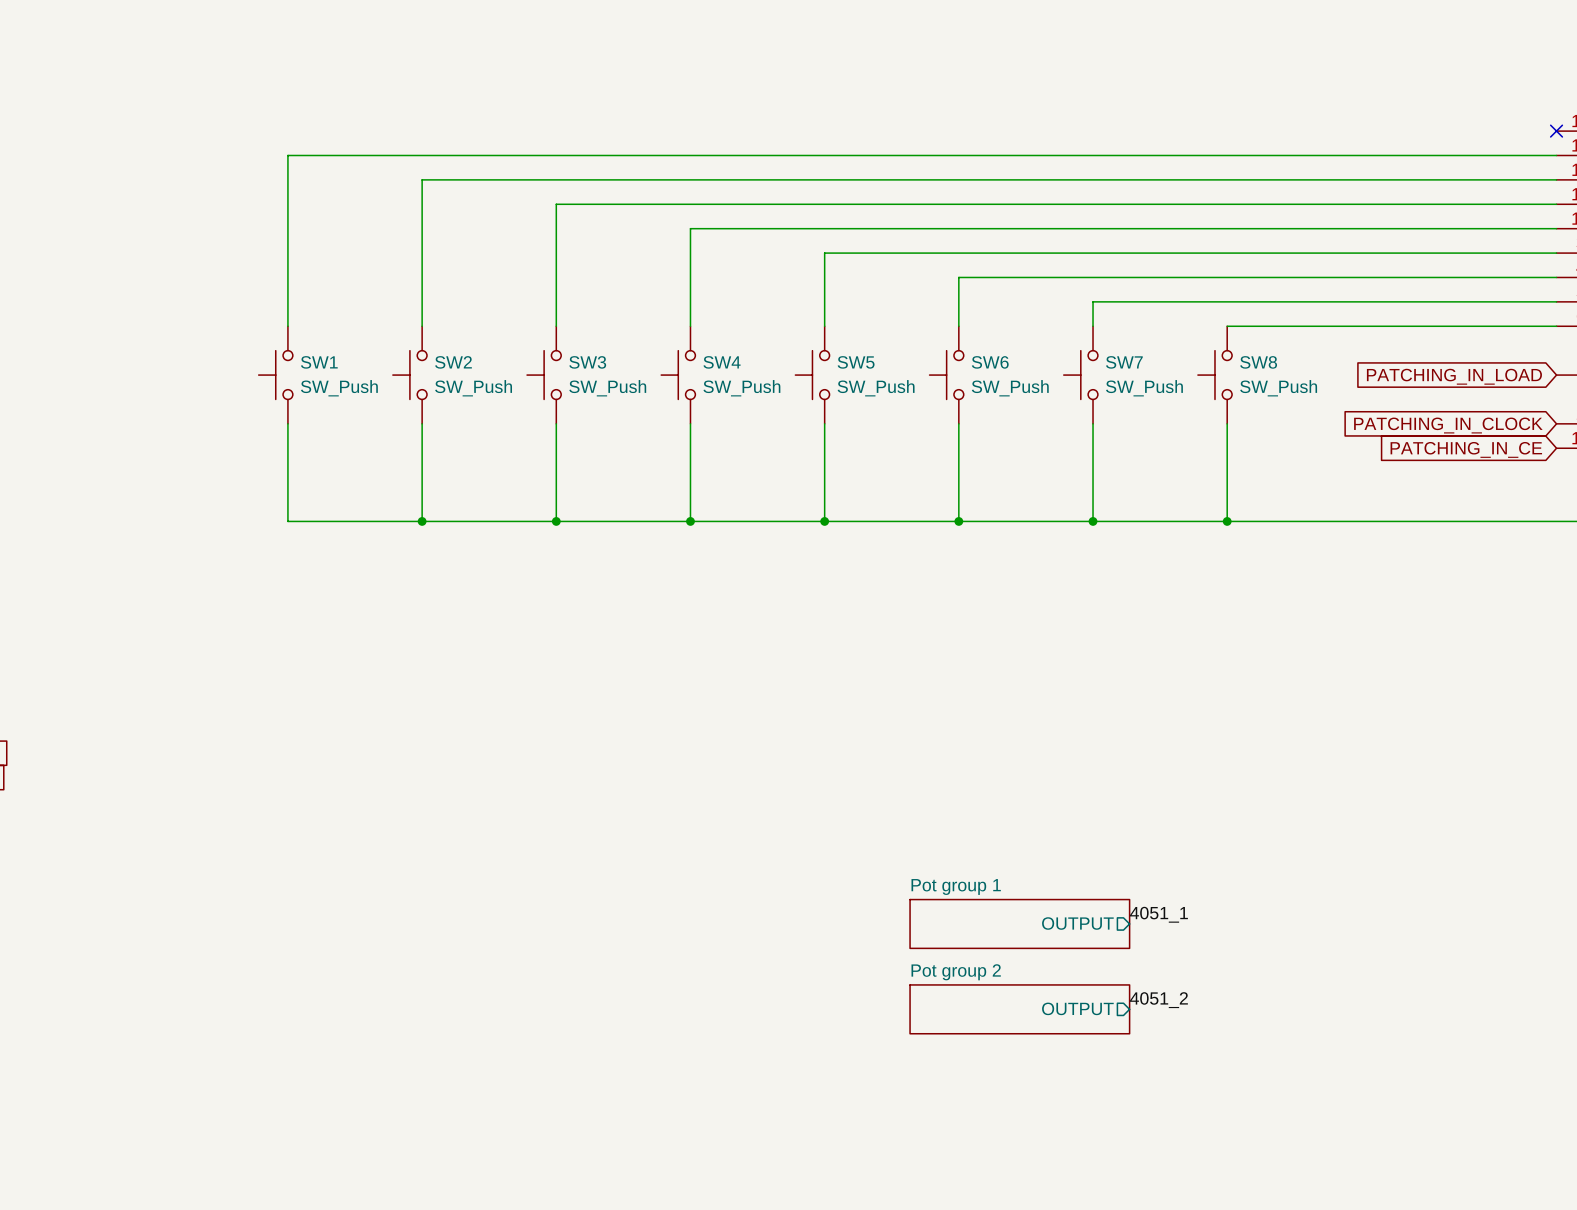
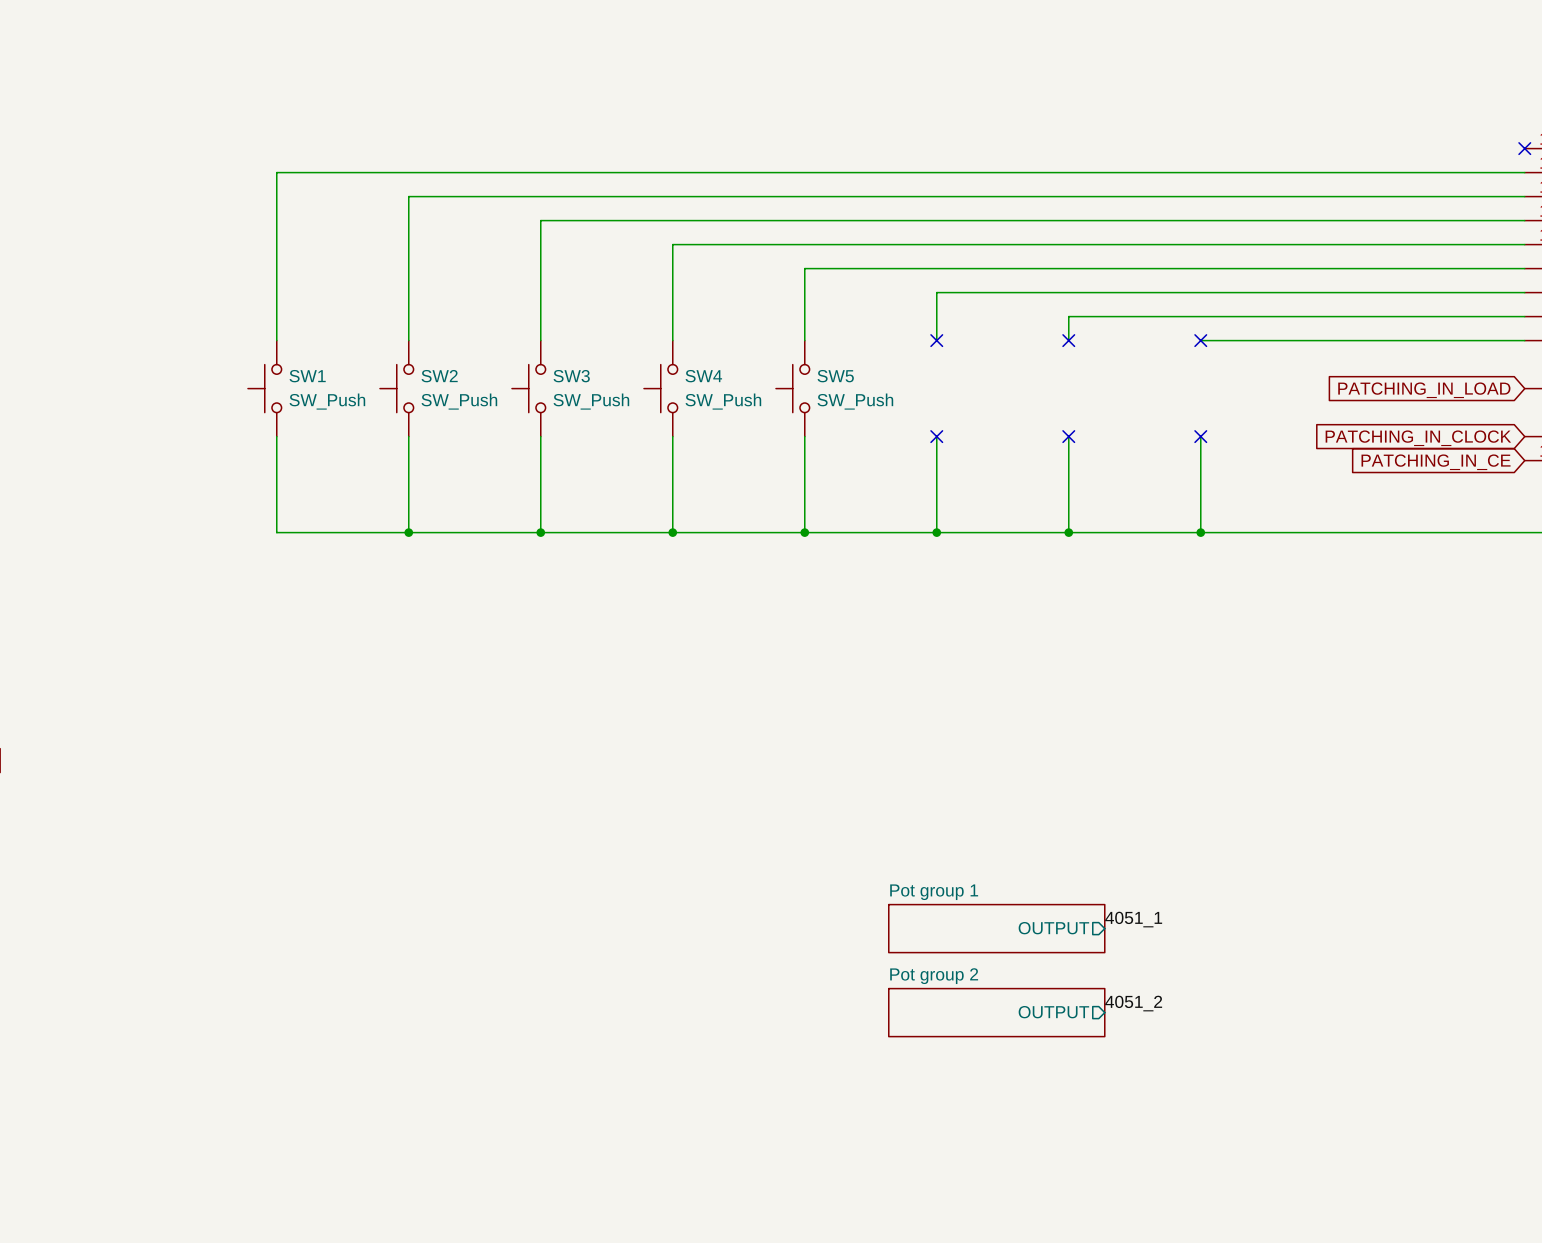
no-connect mark: none -> (936, 340)
no-connect mark: none -> (1068, 340)
no-connect mark: none -> (1200, 340)
SW6: SW_Push (946, 375) -> none
SW7: SW_Push (1080, 375) -> none
SW8: SW_Push (1214, 375) -> none
no-connect mark: none -> (936, 436)
no-connect mark: none -> (1068, 436)
no-connect mark: none -> (1200, 436)

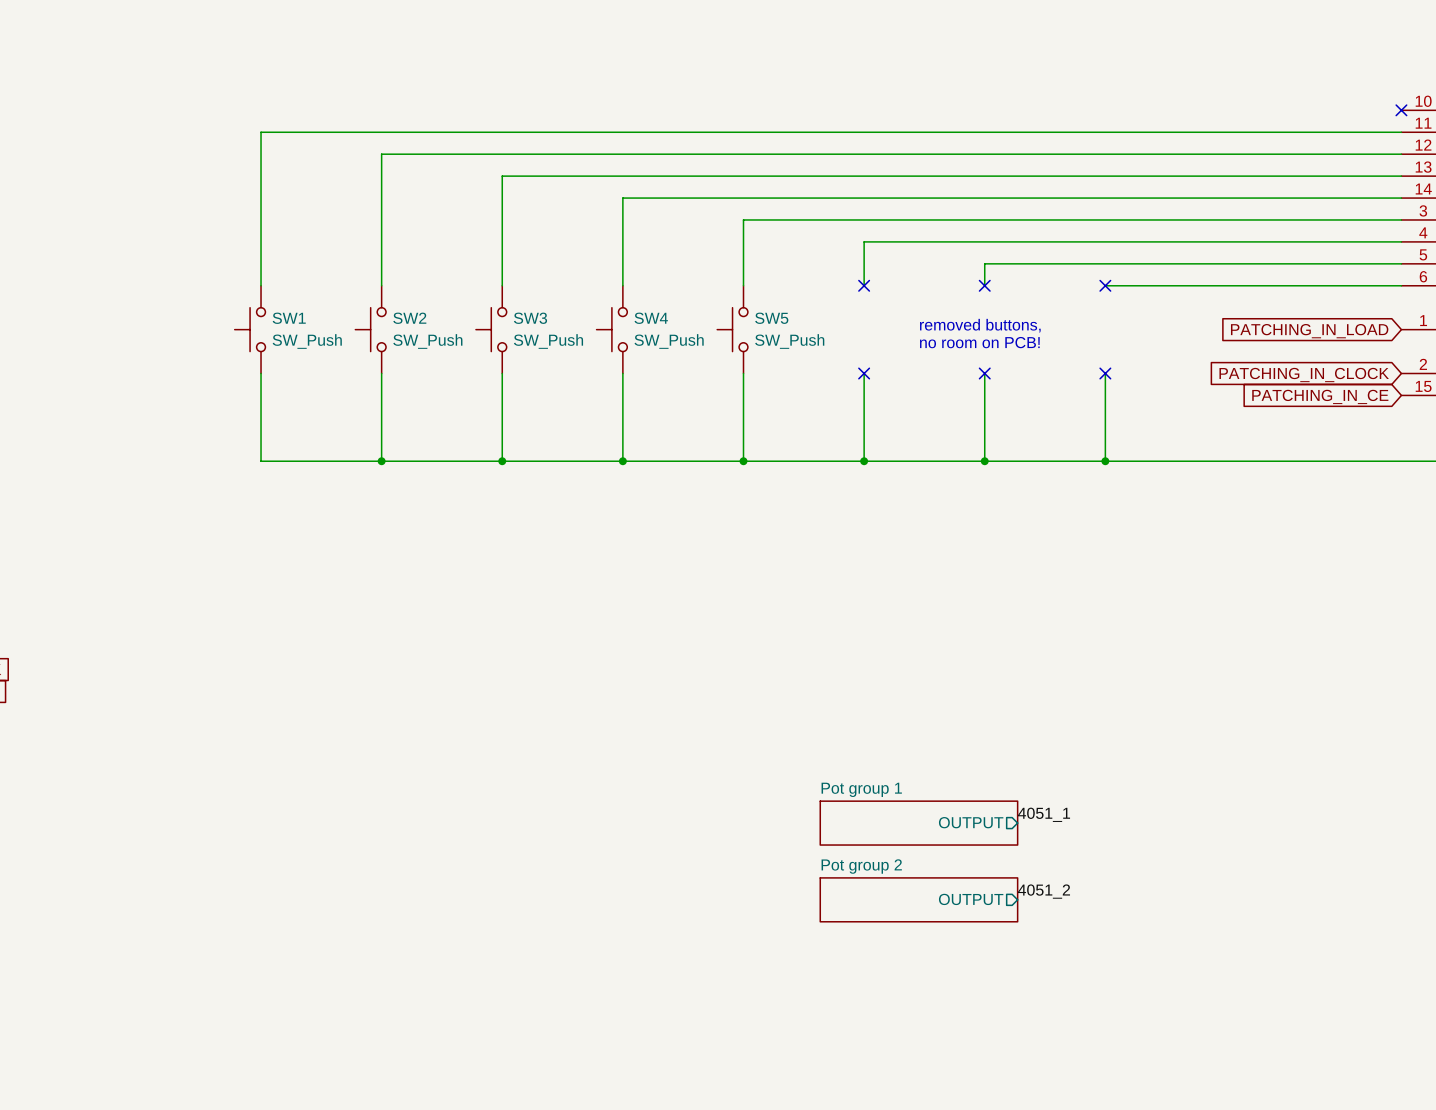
text: none -> removed buttons, (980, 325)
text: none -> no room on PCB! (979, 342)

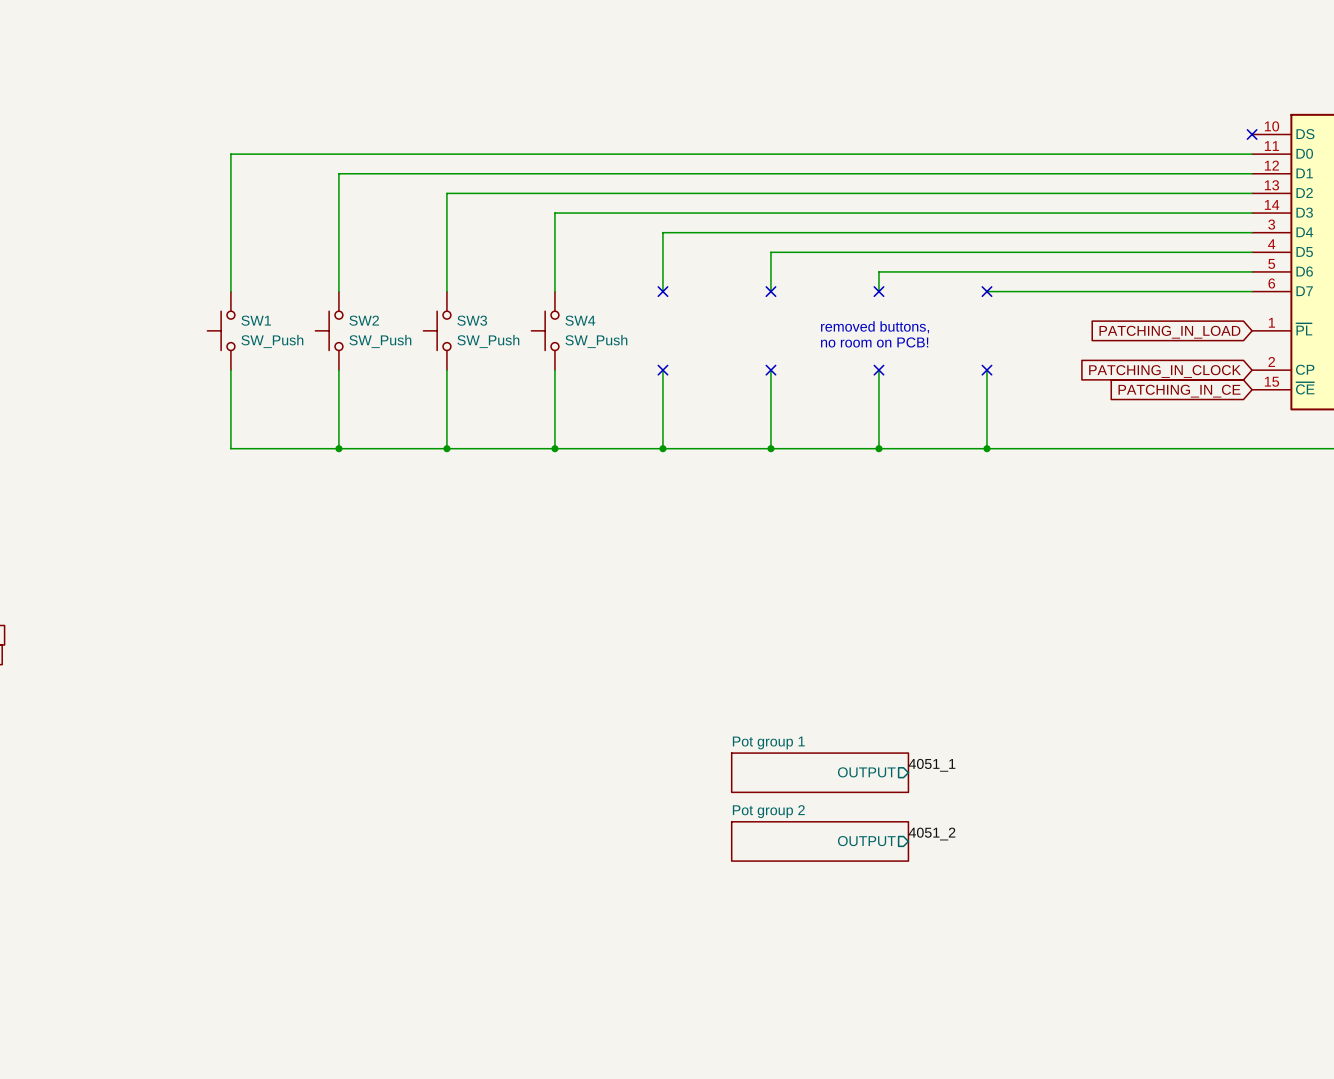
no-connect mark: none -> (662, 291)
SW5: SW_Push (732, 329) -> none
no-connect mark: none -> (662, 370)

